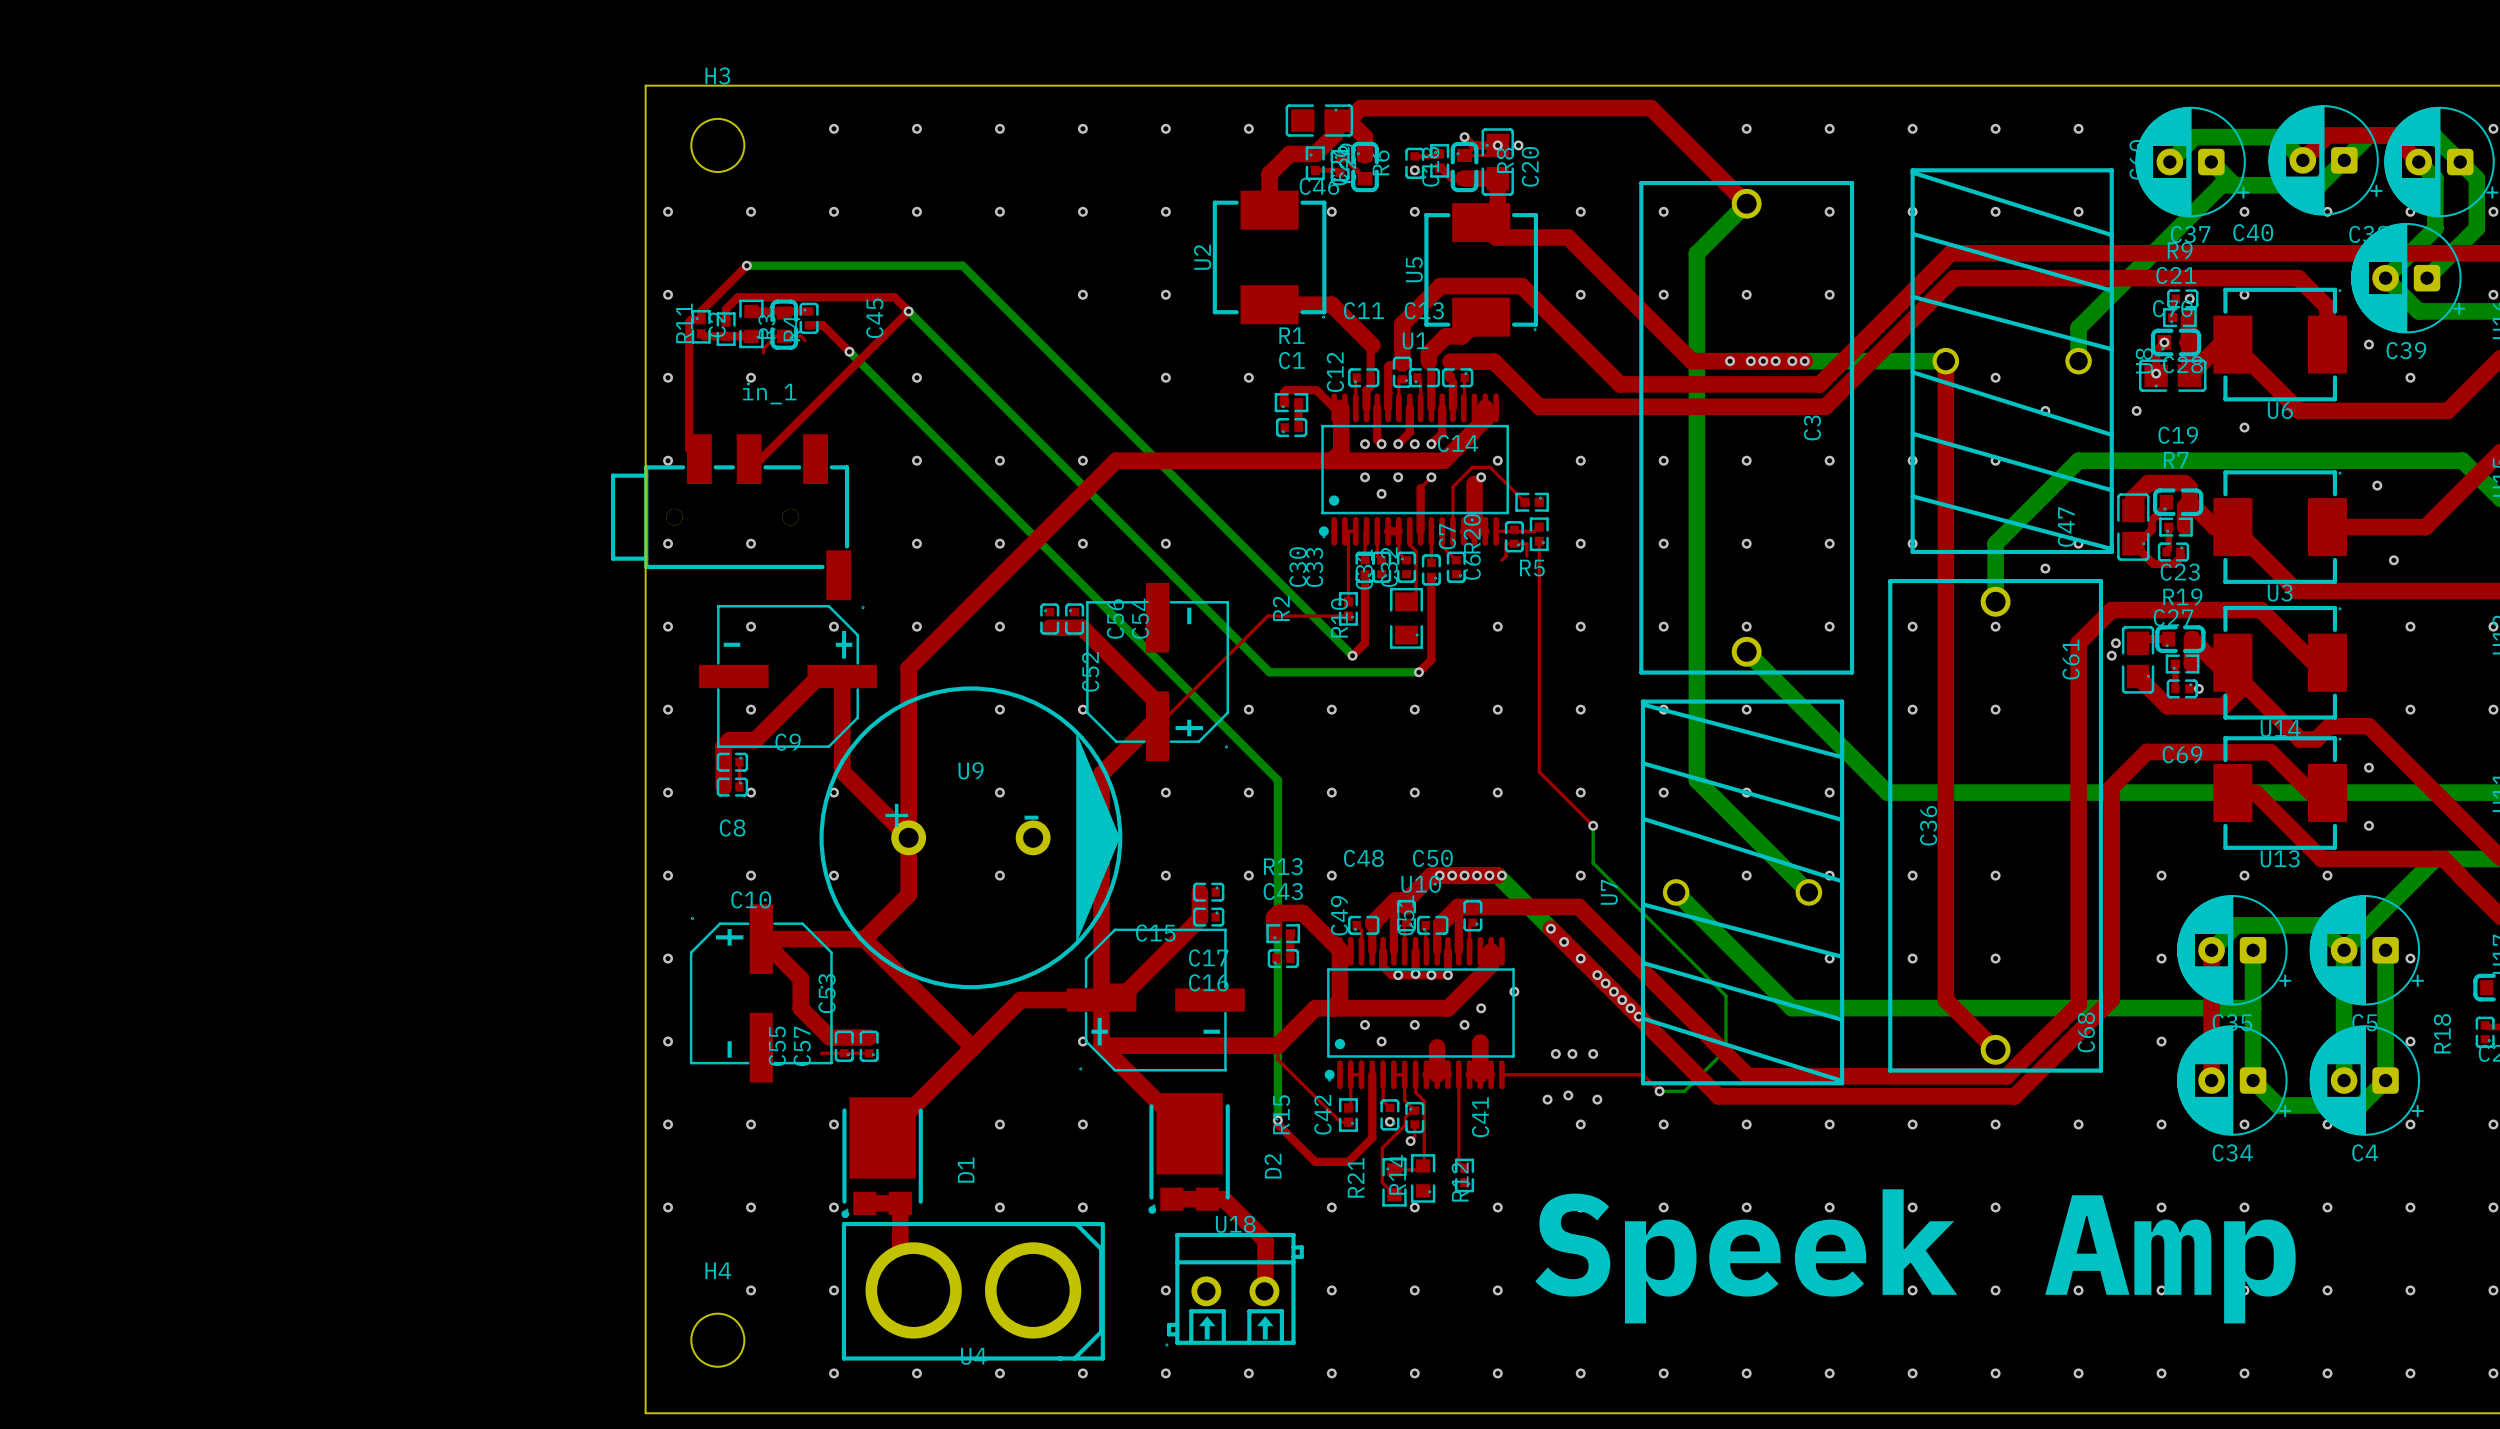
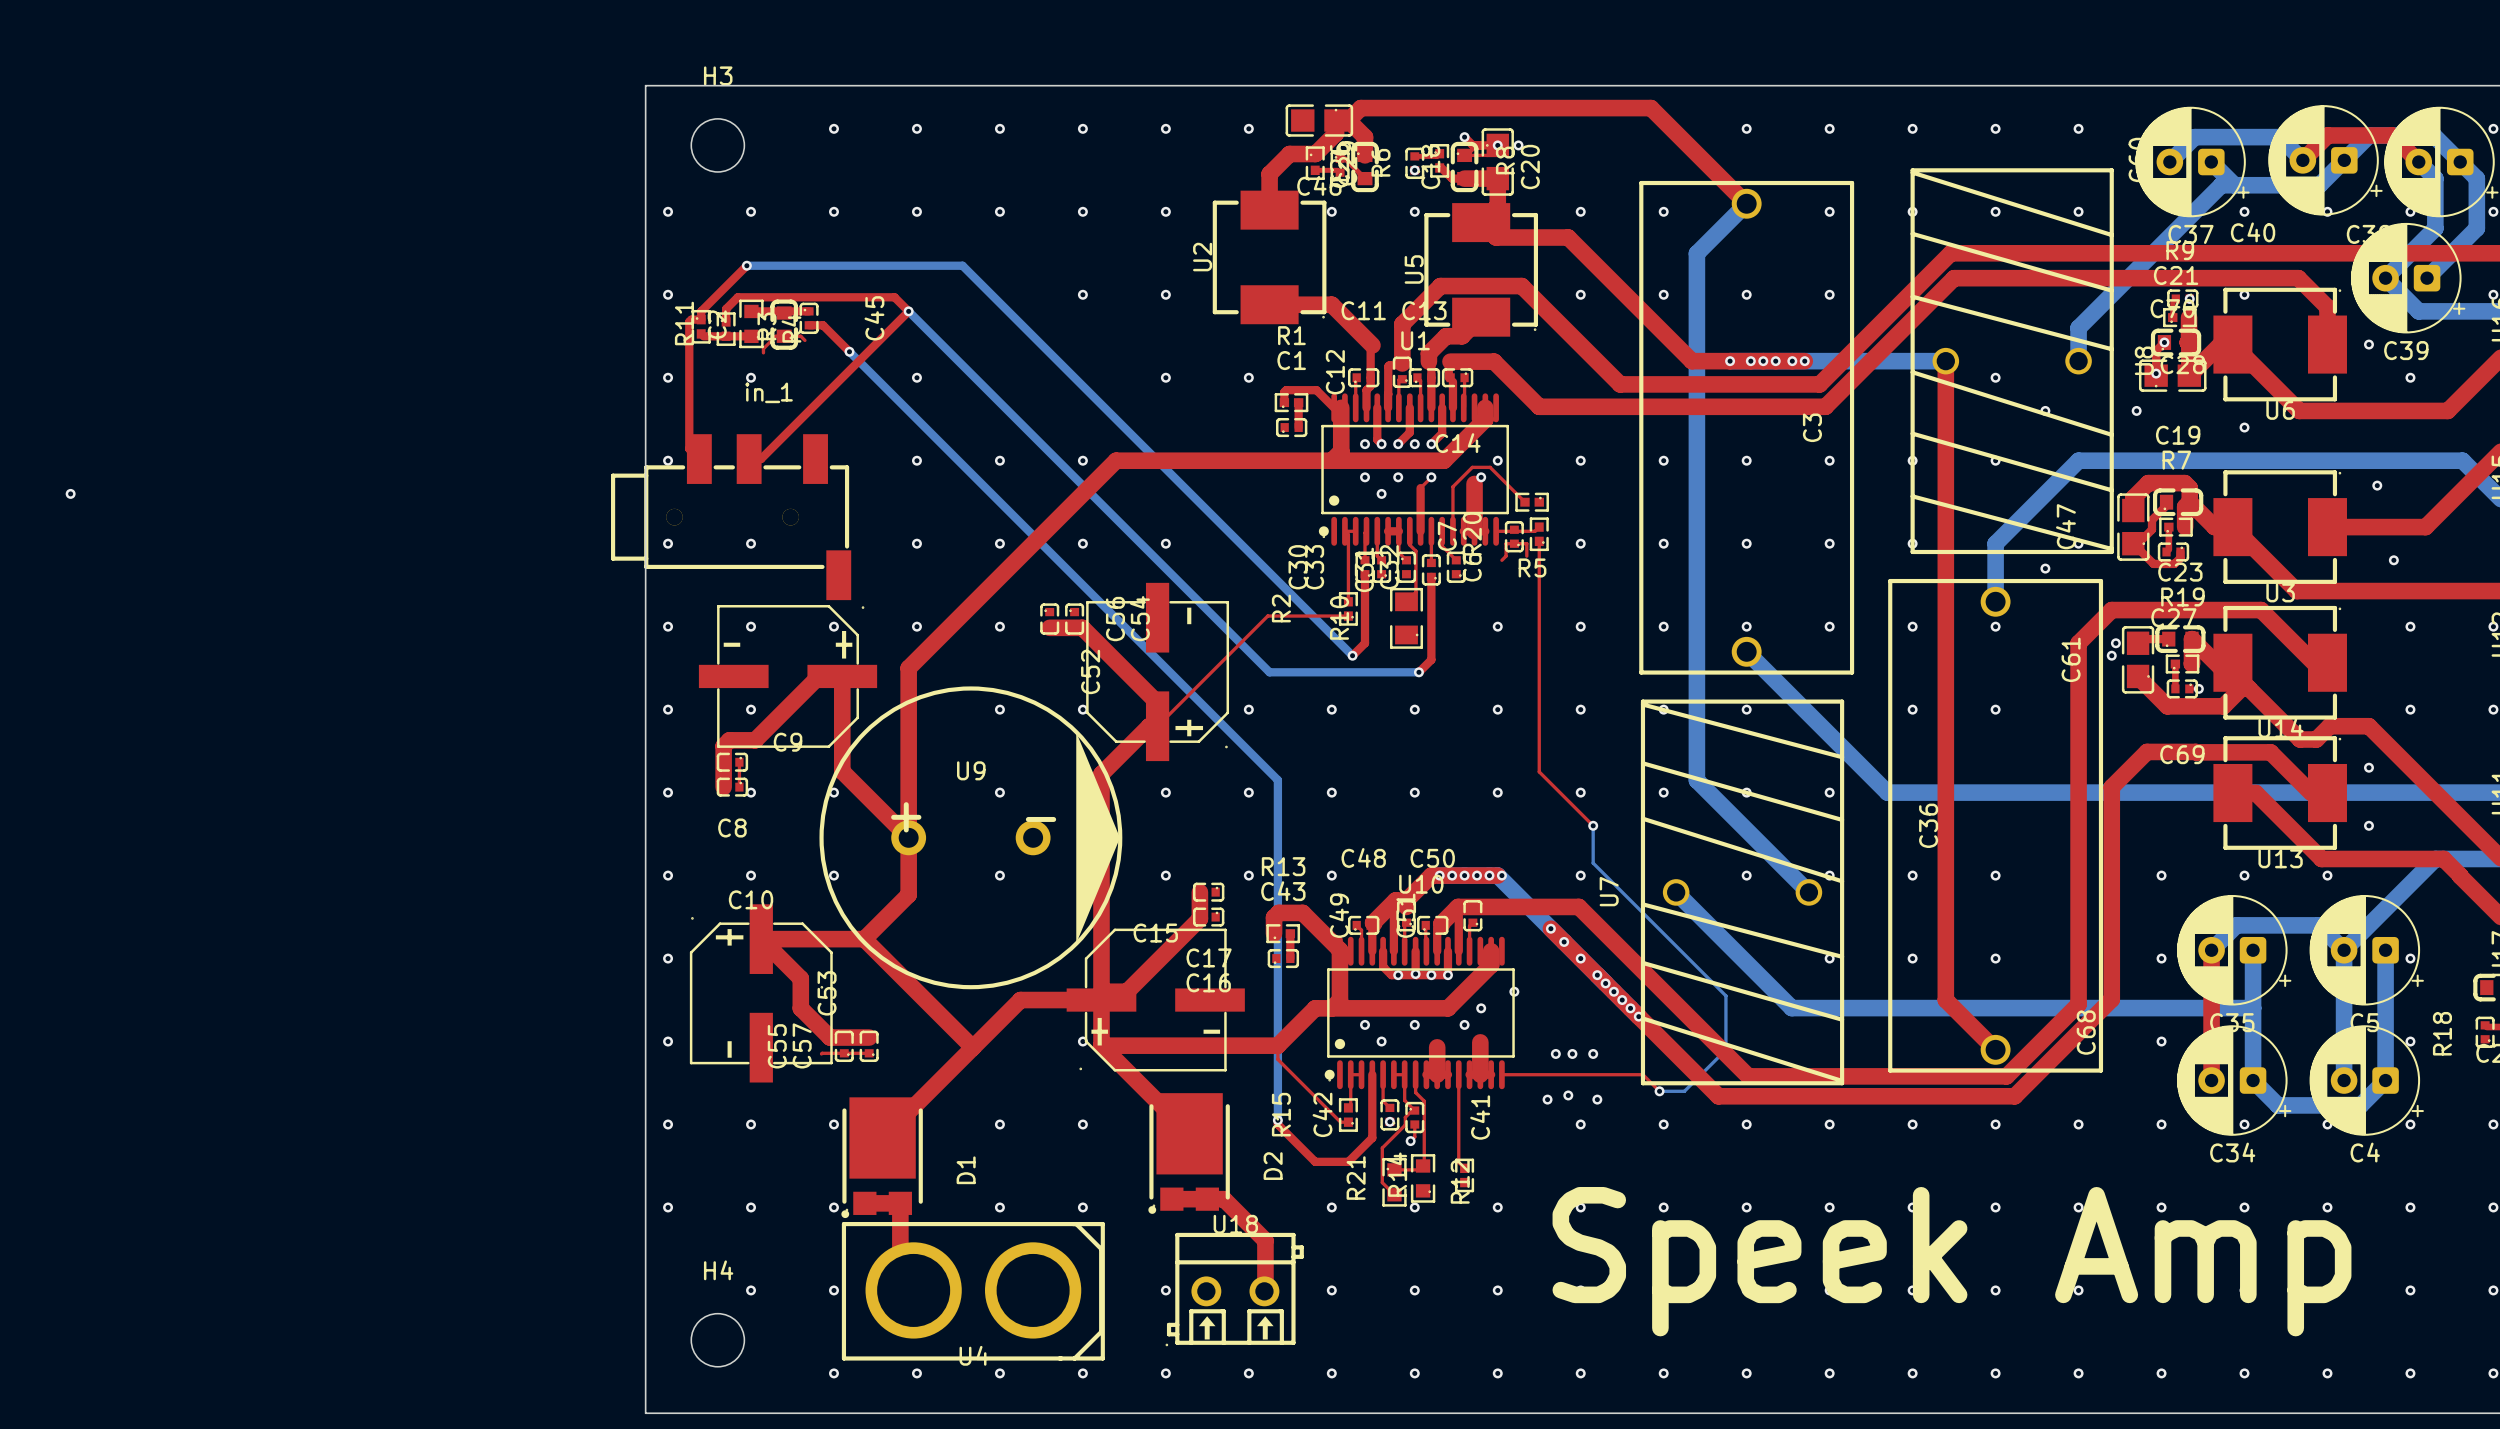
via: none -> (70, 493)

